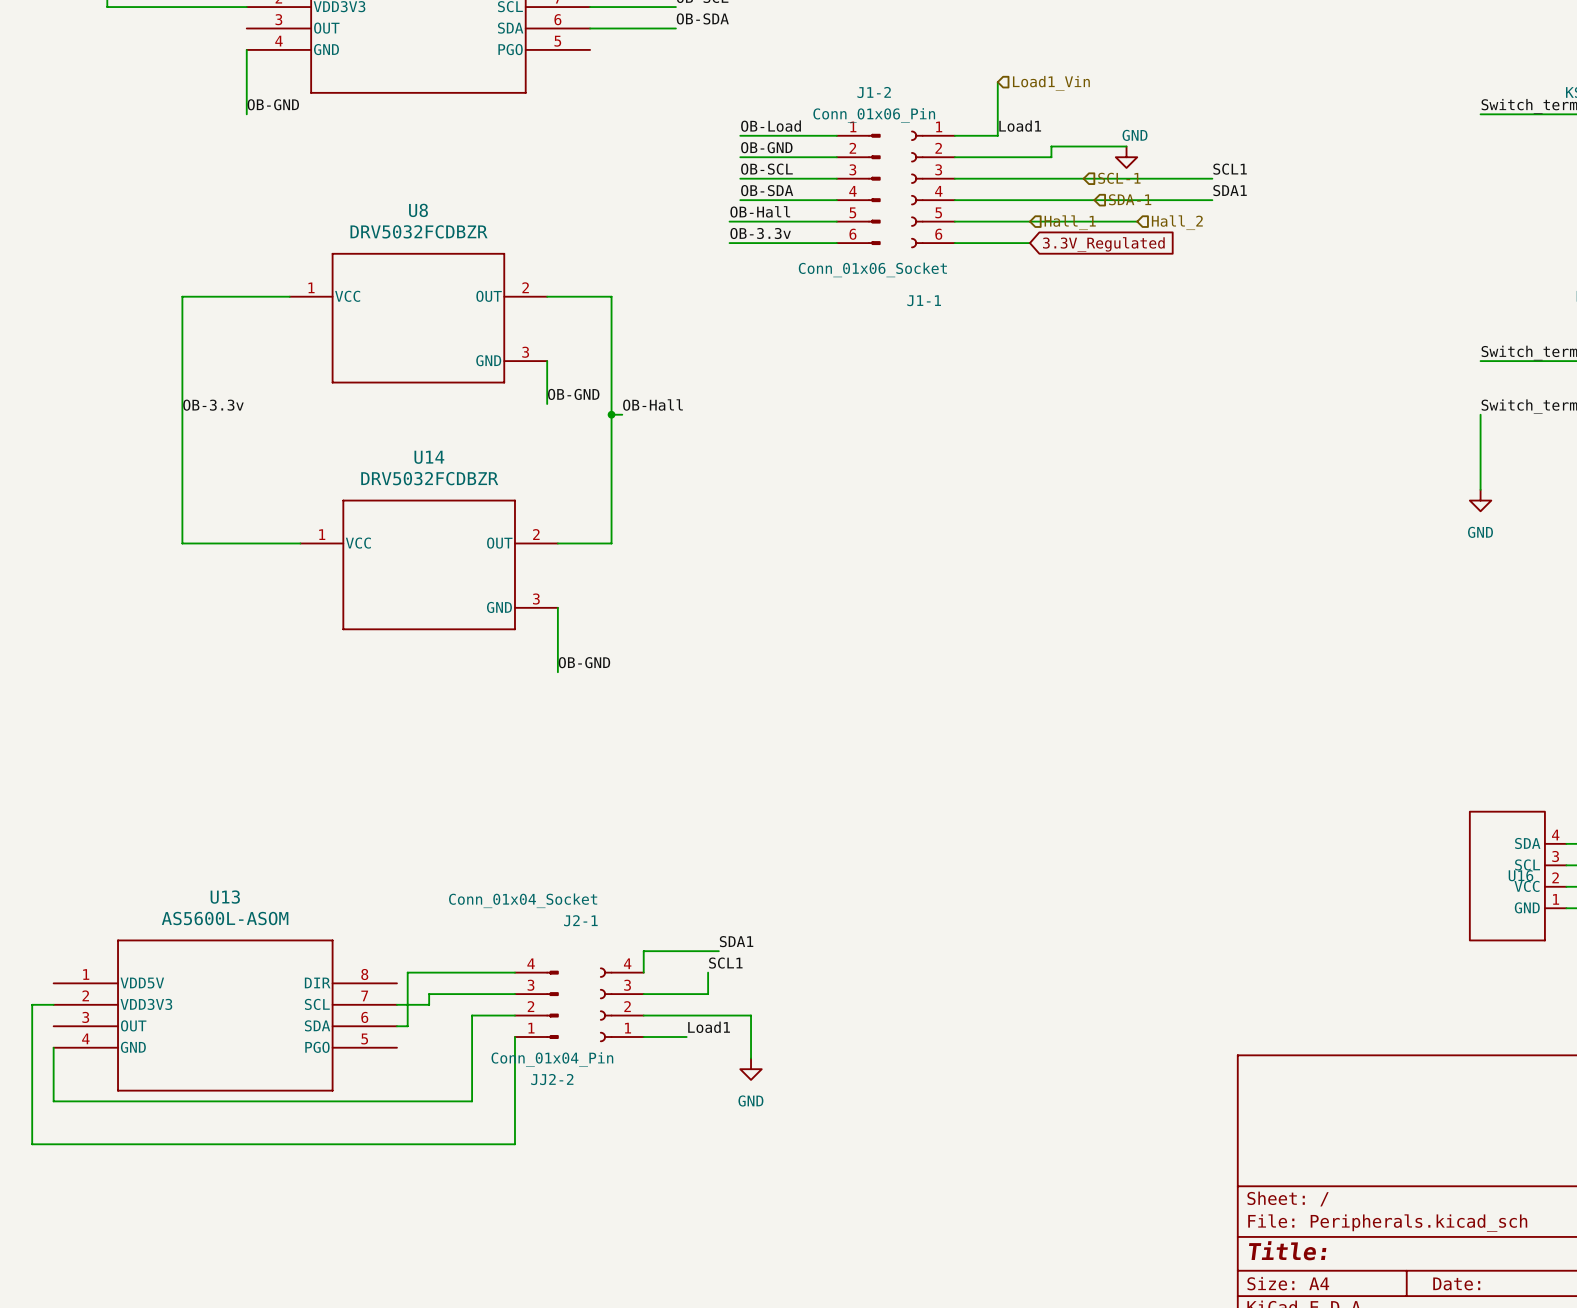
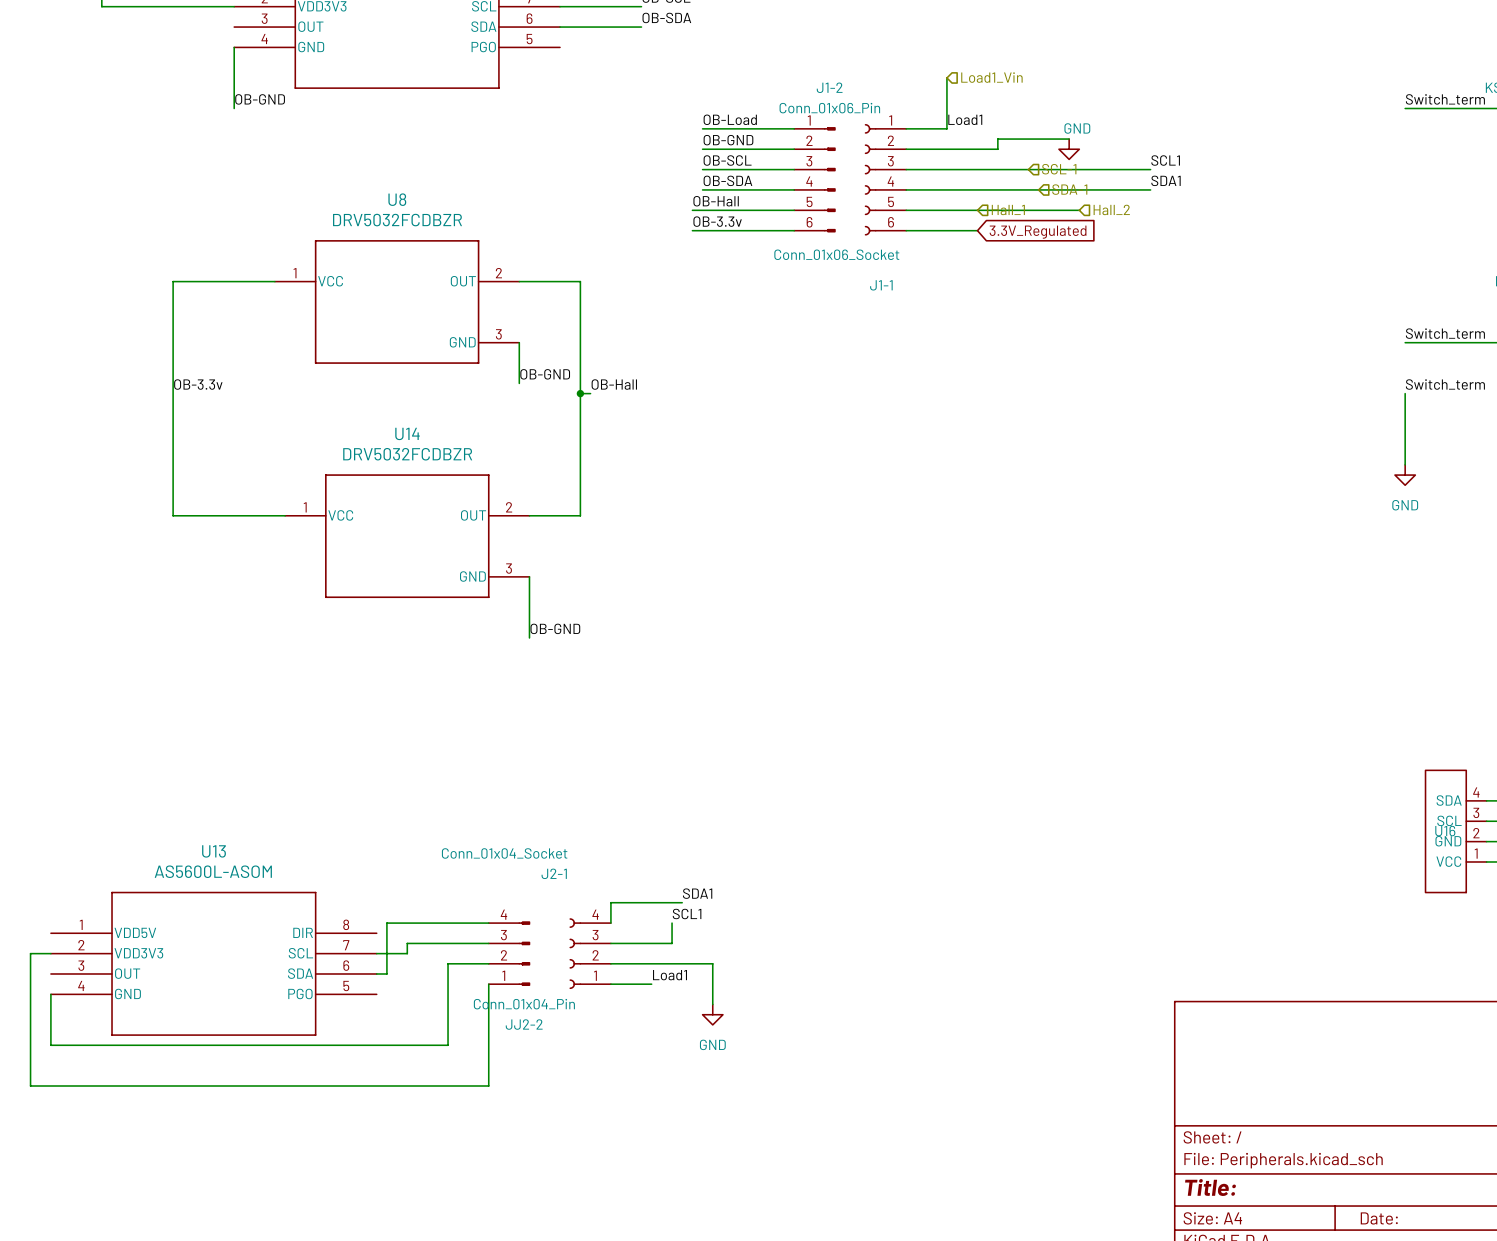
U16 symbol: [1469, 811, 1567, 941] -> [1425, 770, 1487, 893]

